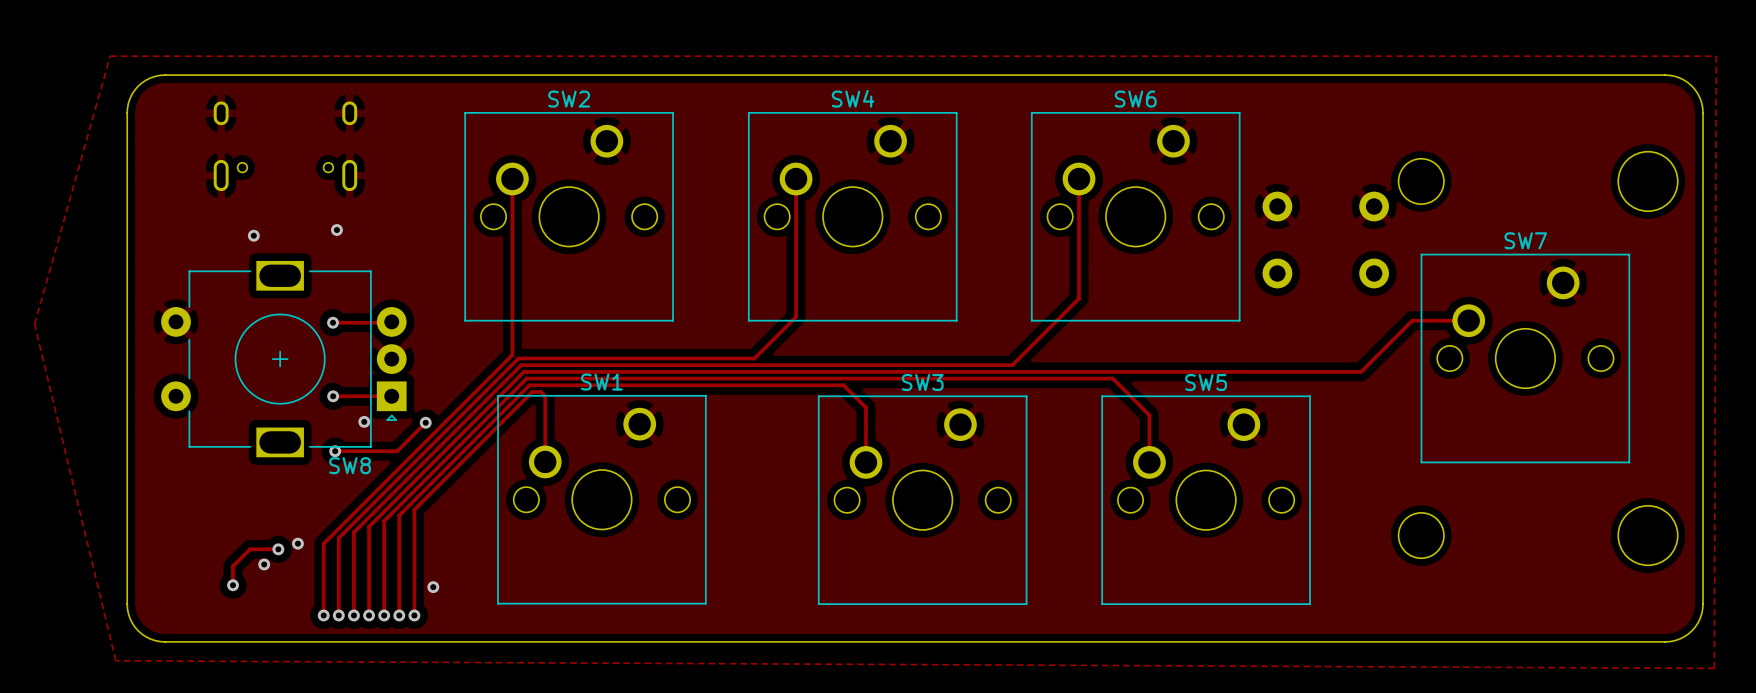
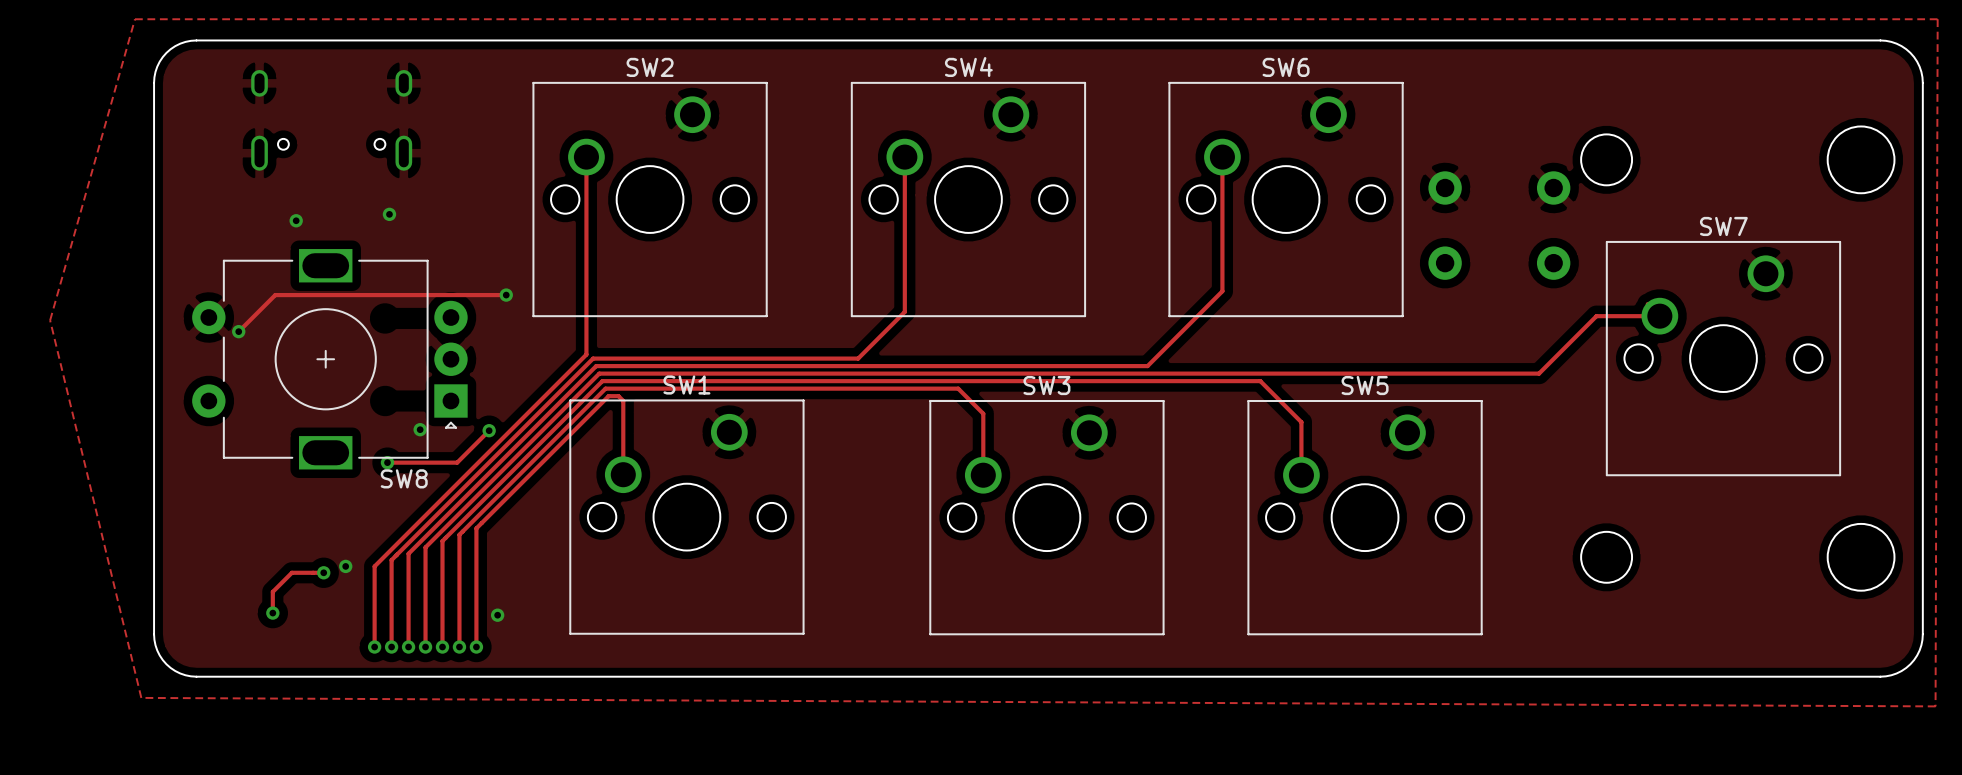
track: none -> (506, 295) (275, 295) (238, 331)
via: none -> (506, 295)
track: (391, 321) (333, 322) -> none
via: (333, 322) -> none
via: none -> (238, 331)
track: (333, 396) (391, 396) -> none
via: (333, 396) -> none
via: (264, 564) -> none

